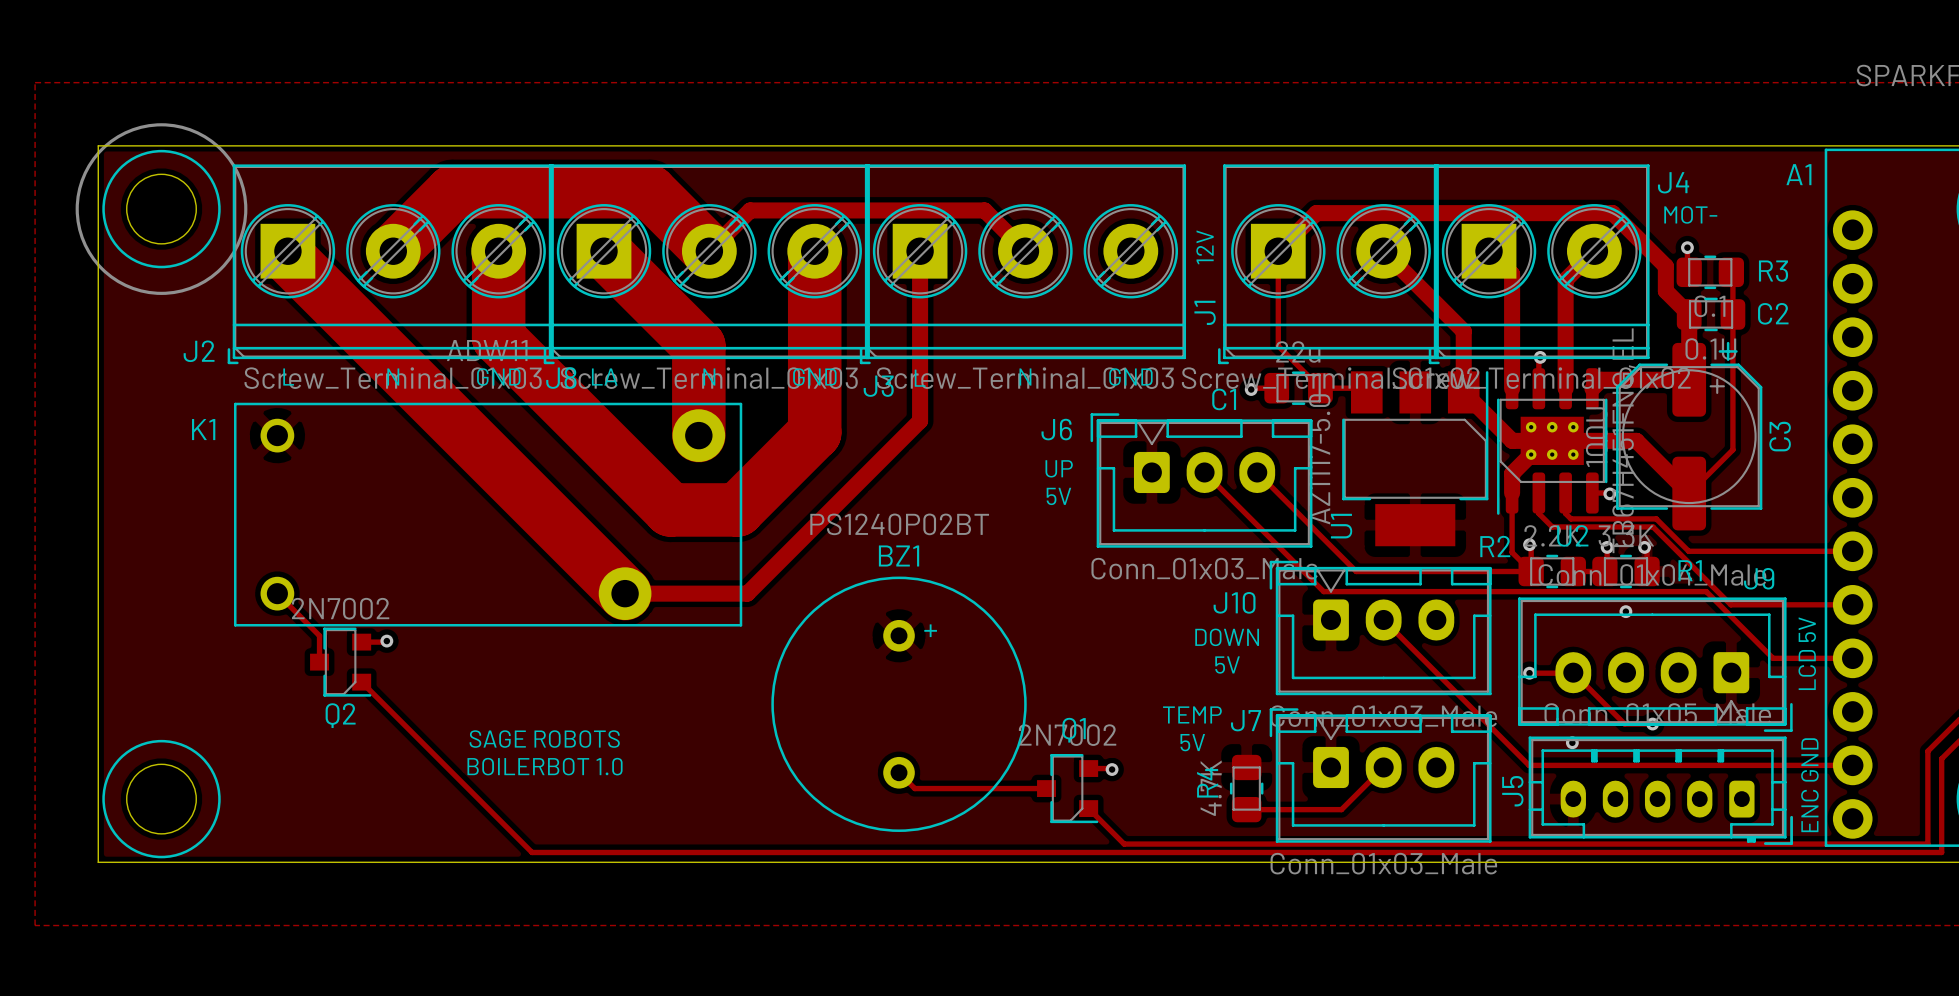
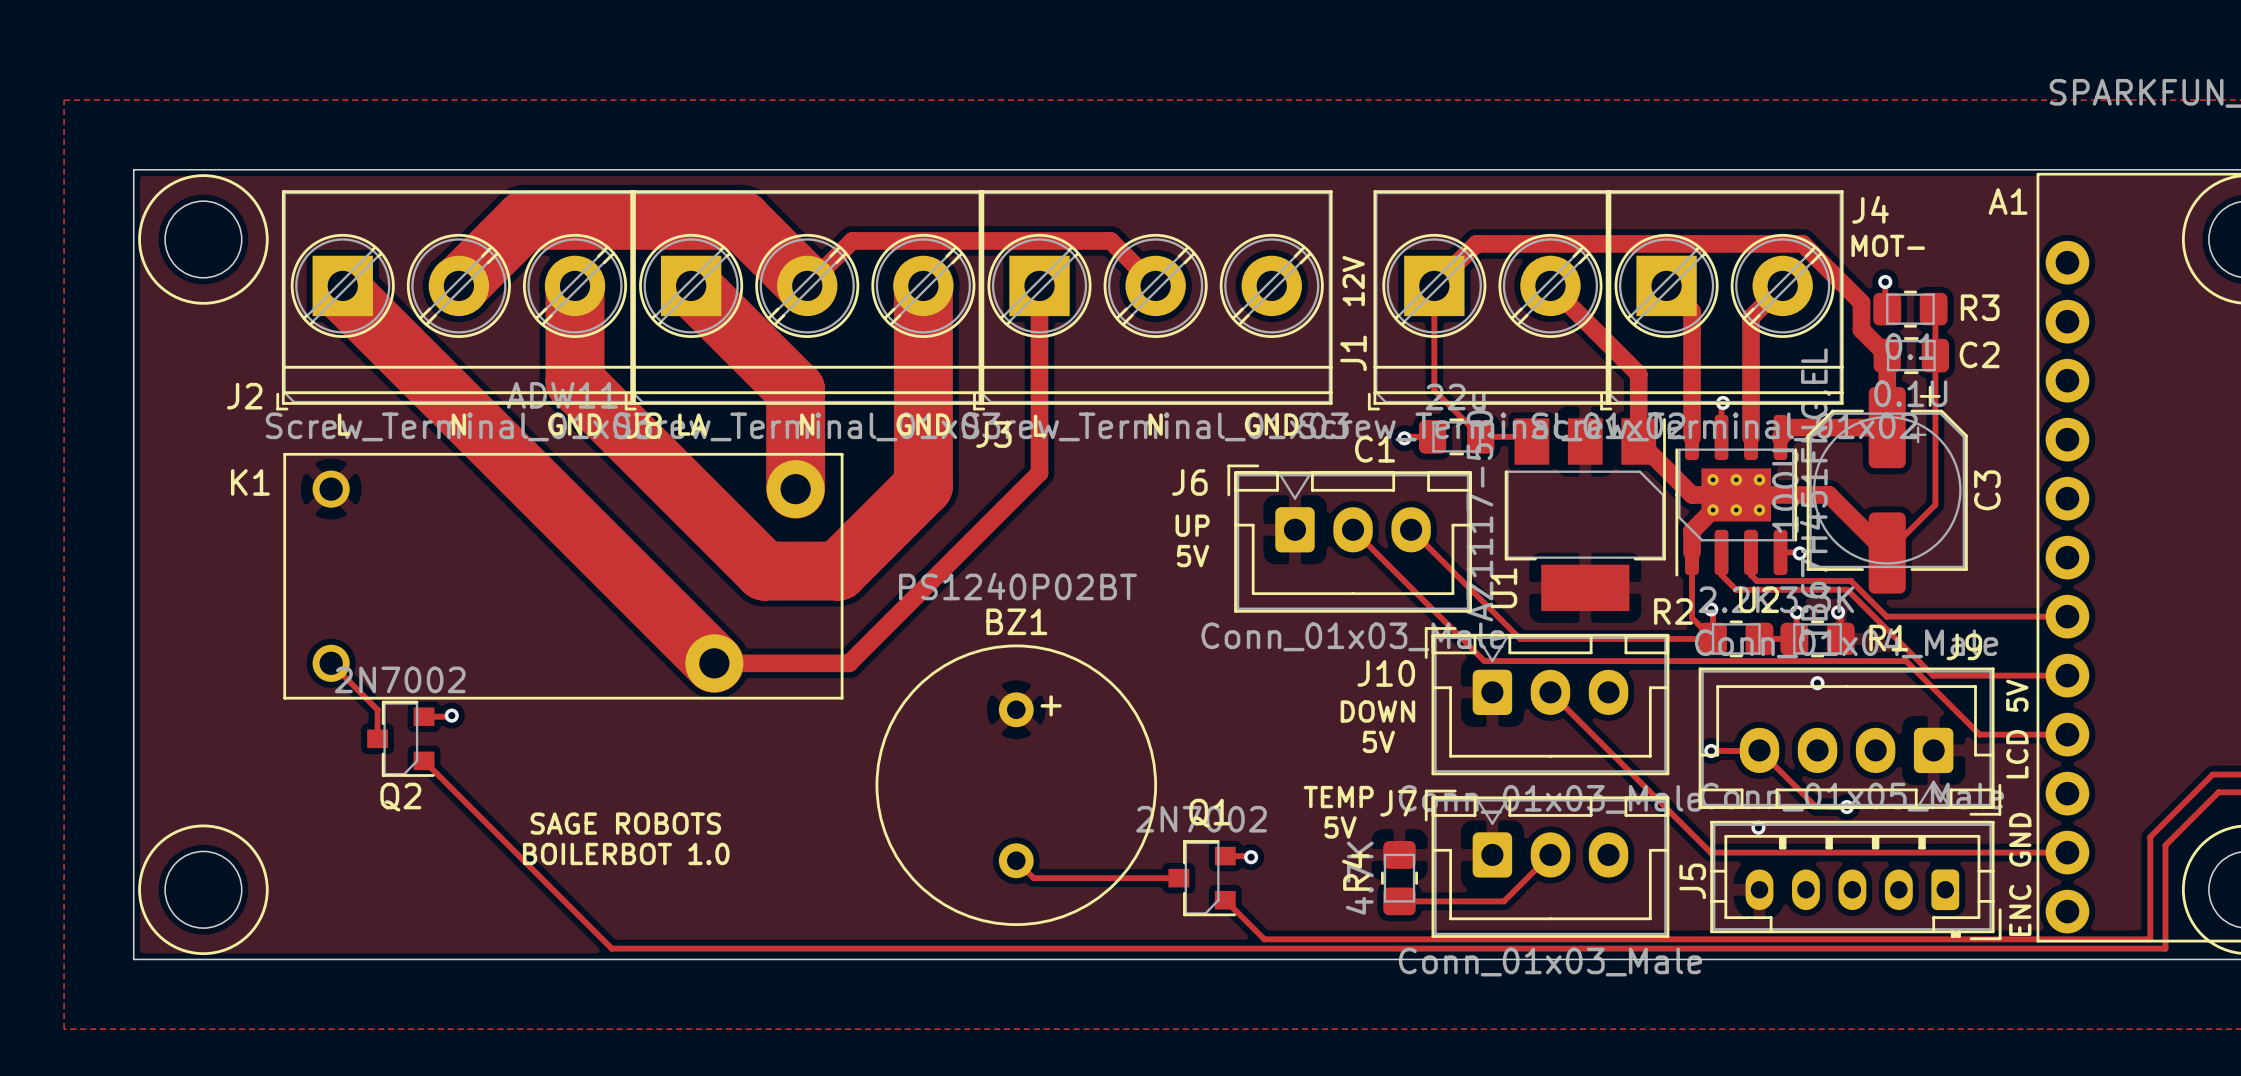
drawing: [75, 123, 248, 295] -> none

